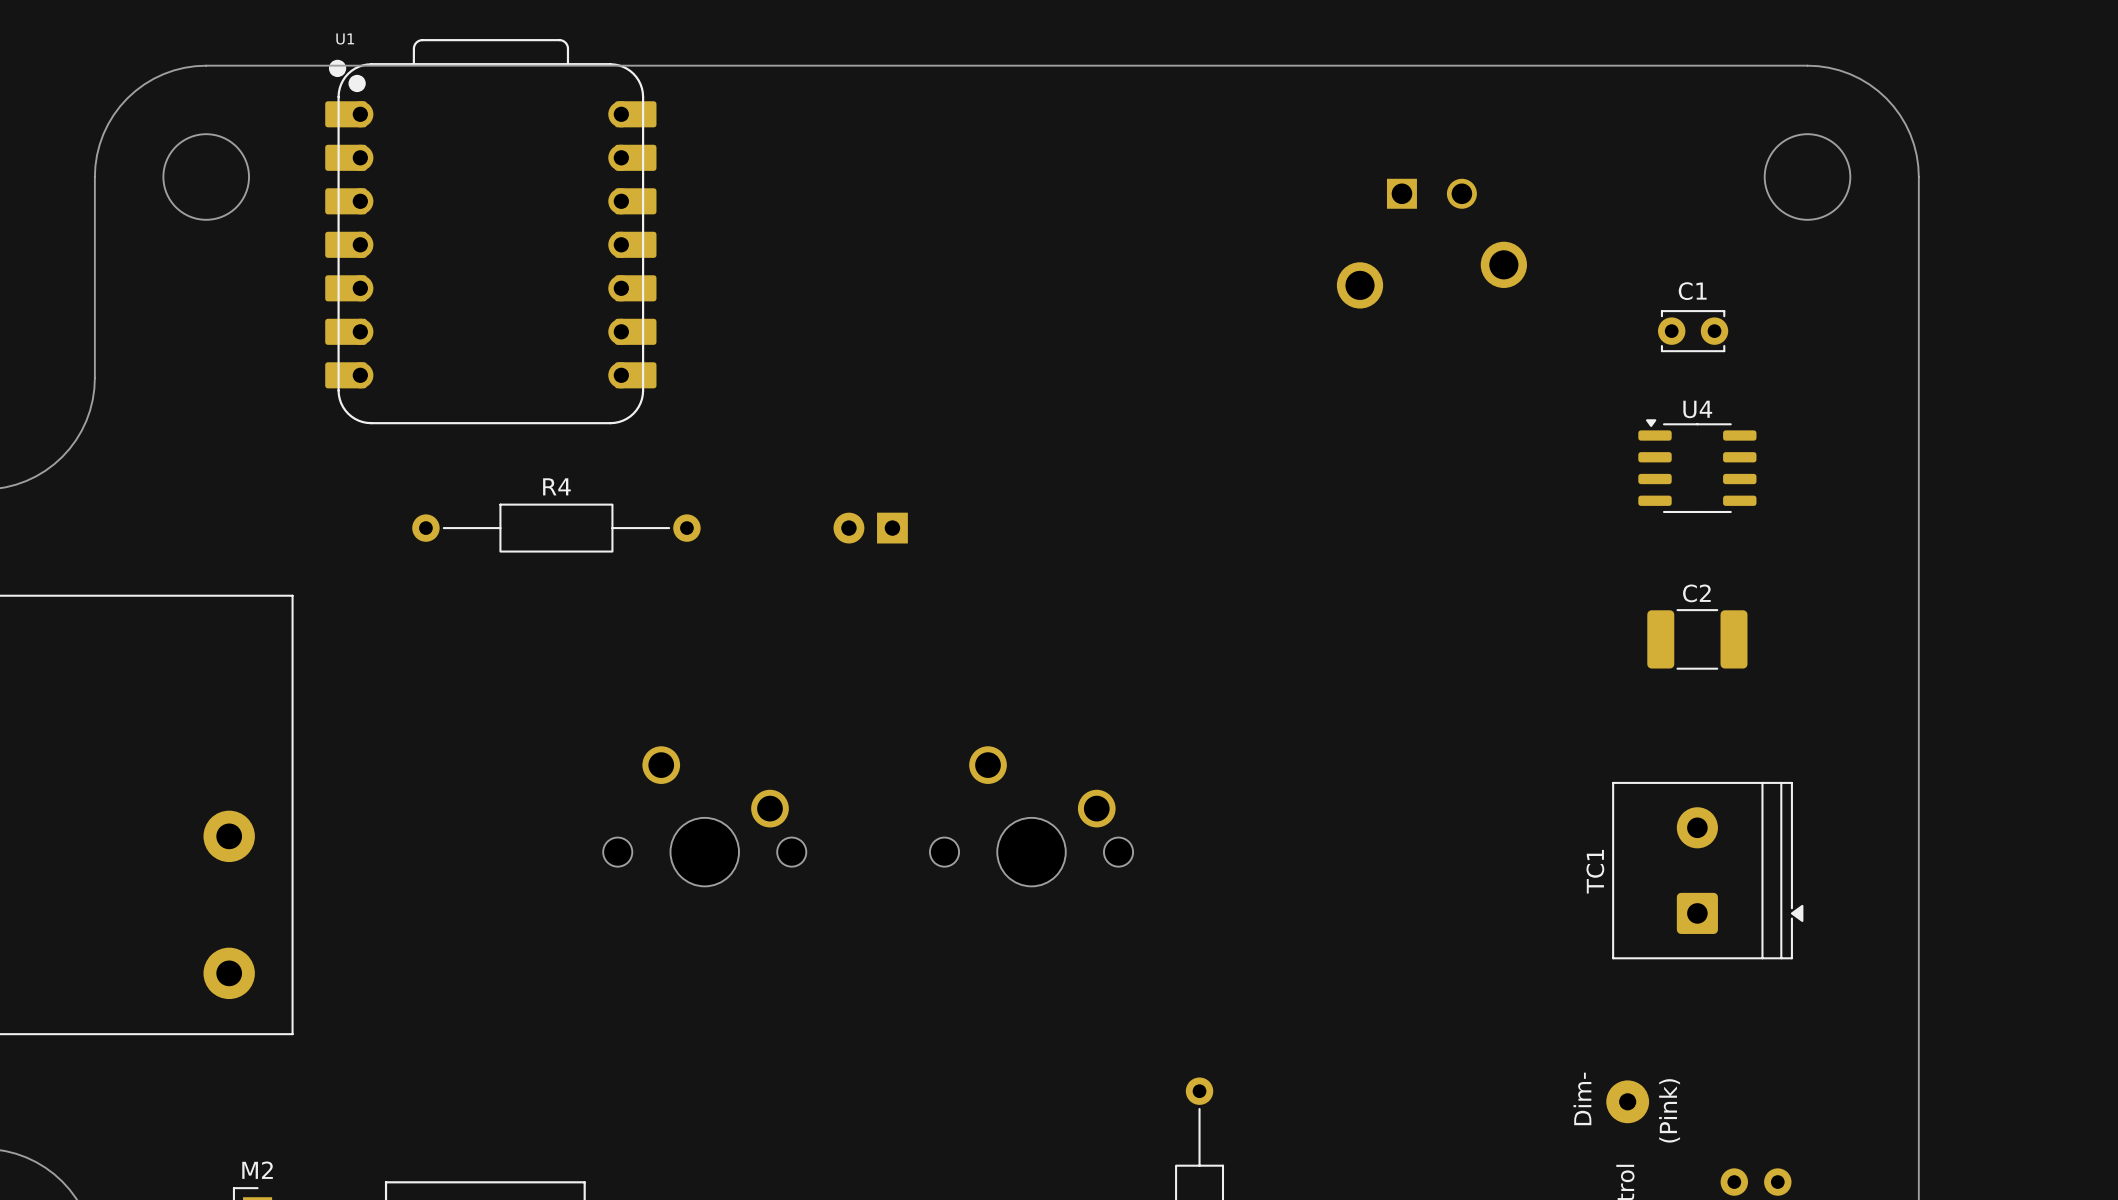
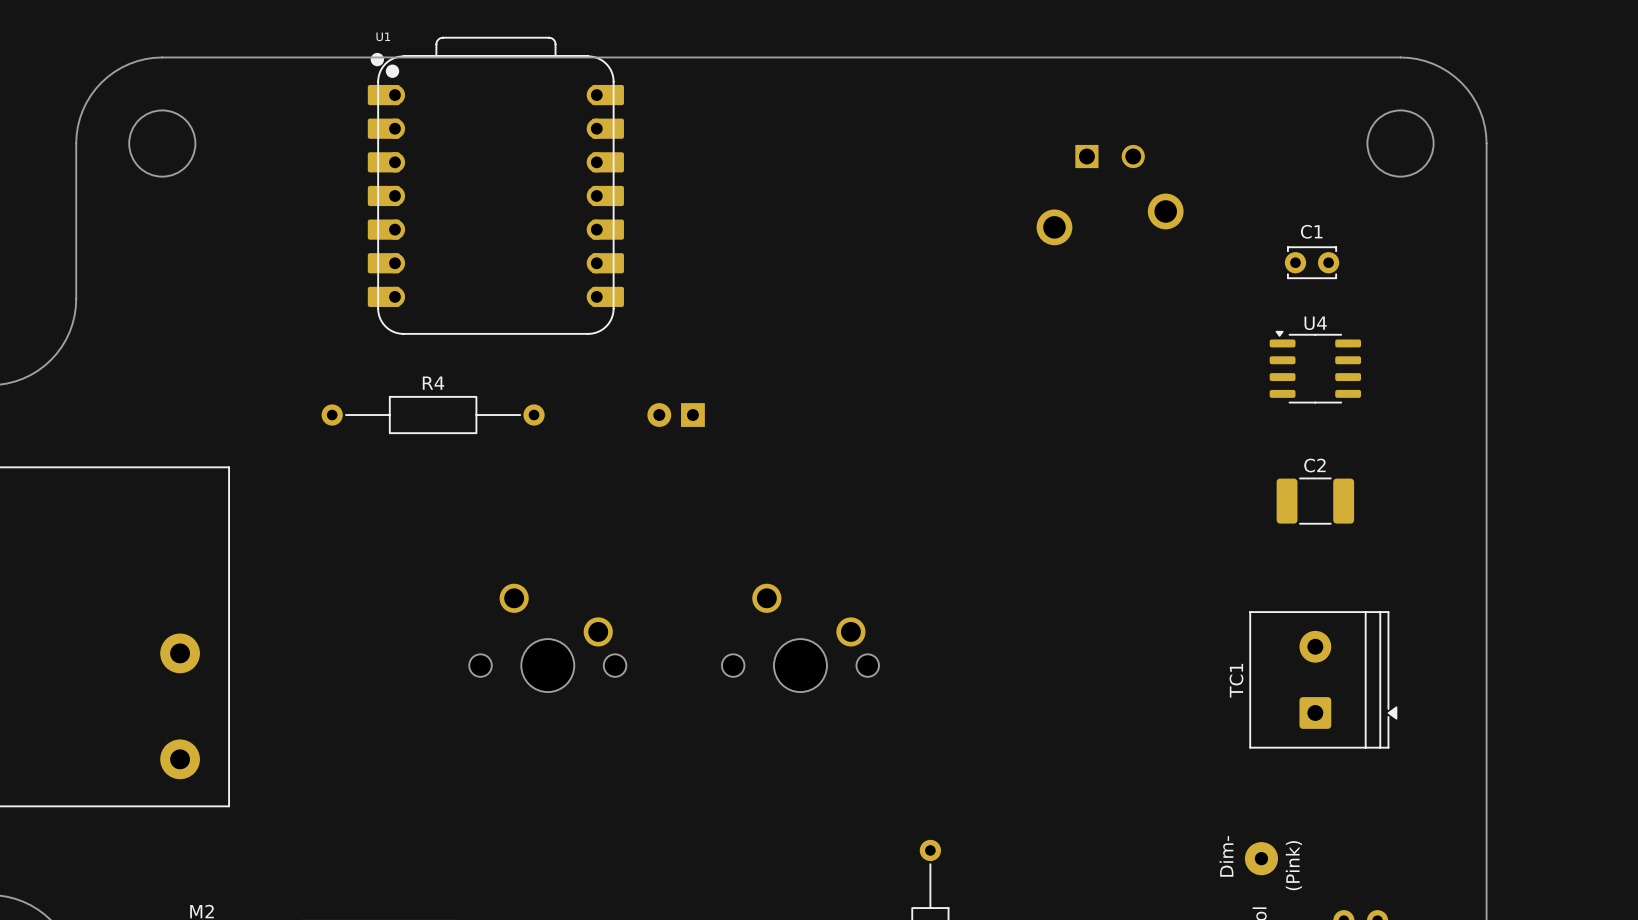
U1 position: (490, 231) -> (495, 185)

